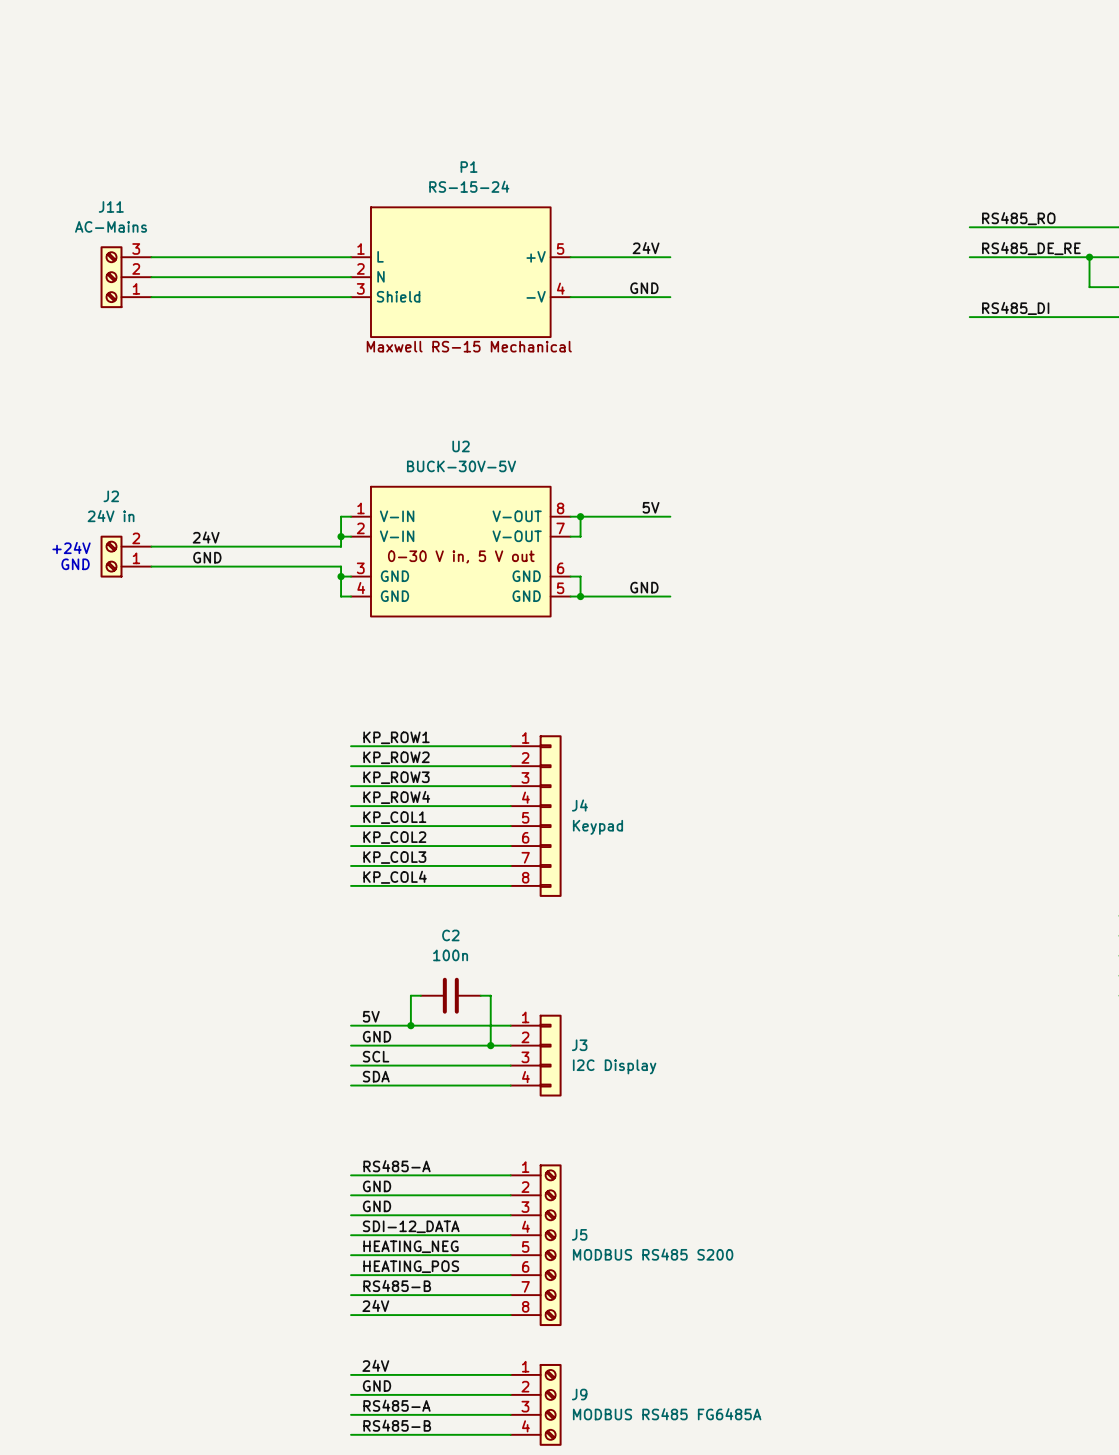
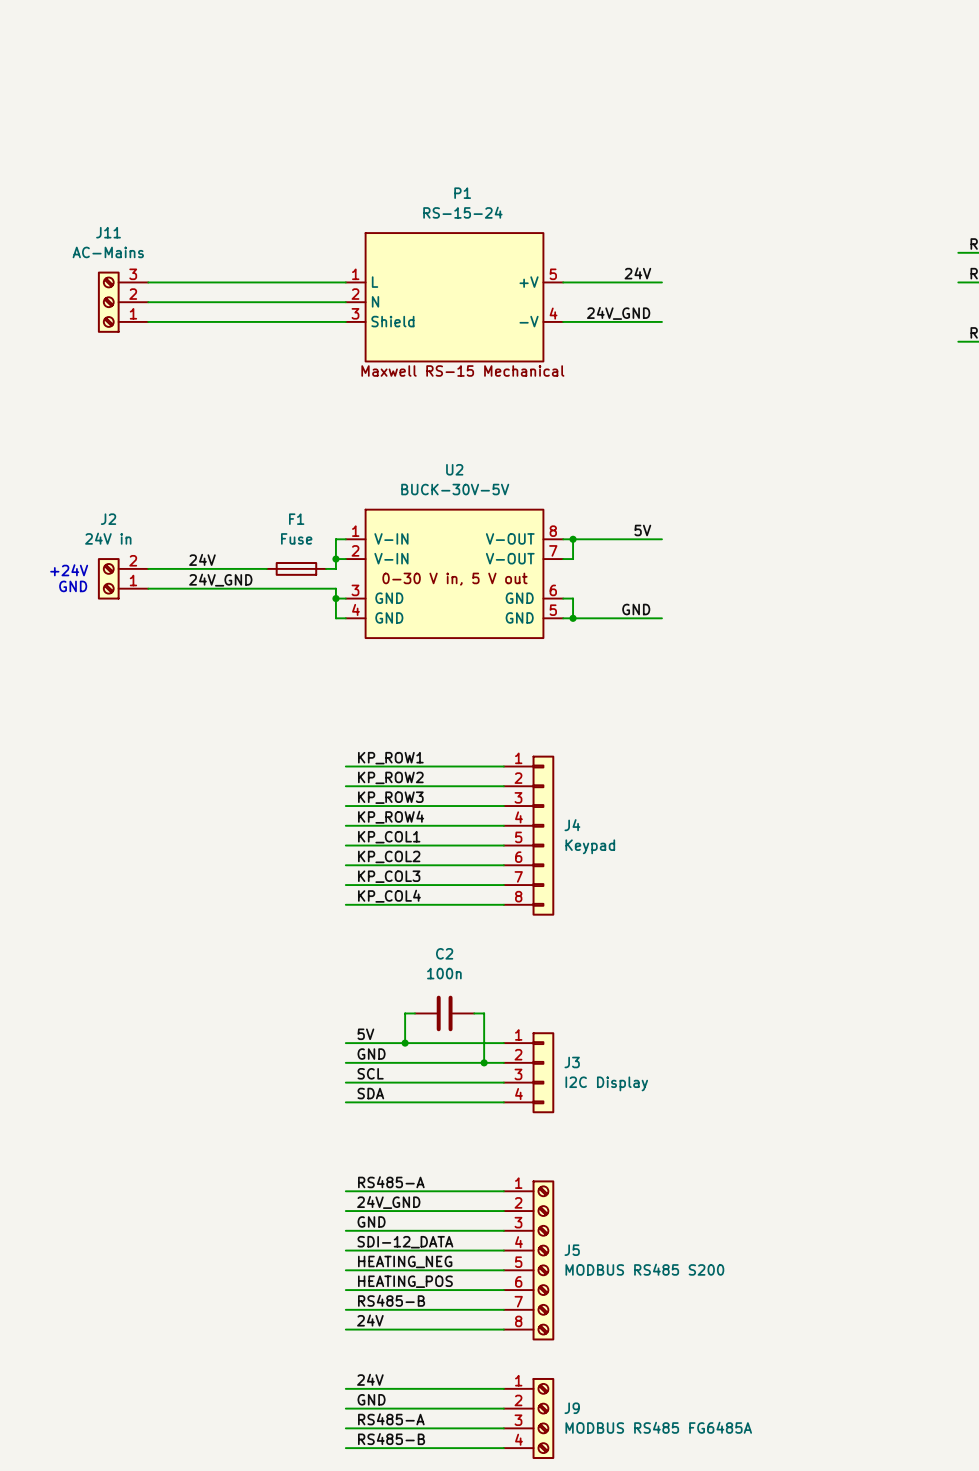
label: GND (644, 288) -> 24V_GND (618, 313)
F1: none -> Fuse (296, 568)
label: GND (207, 557) -> 24V_GND (220, 580)
label: GND (377, 1186) -> 24V_GND (388, 1202)

